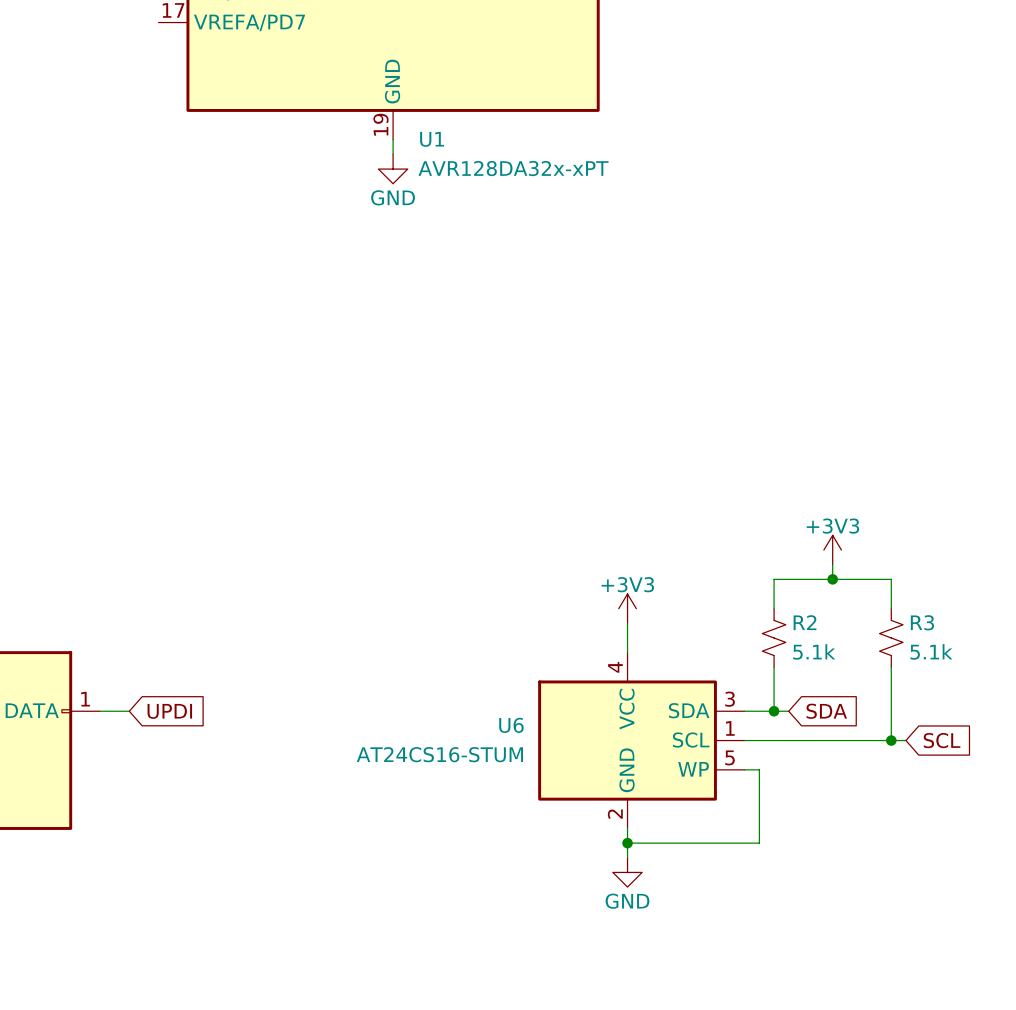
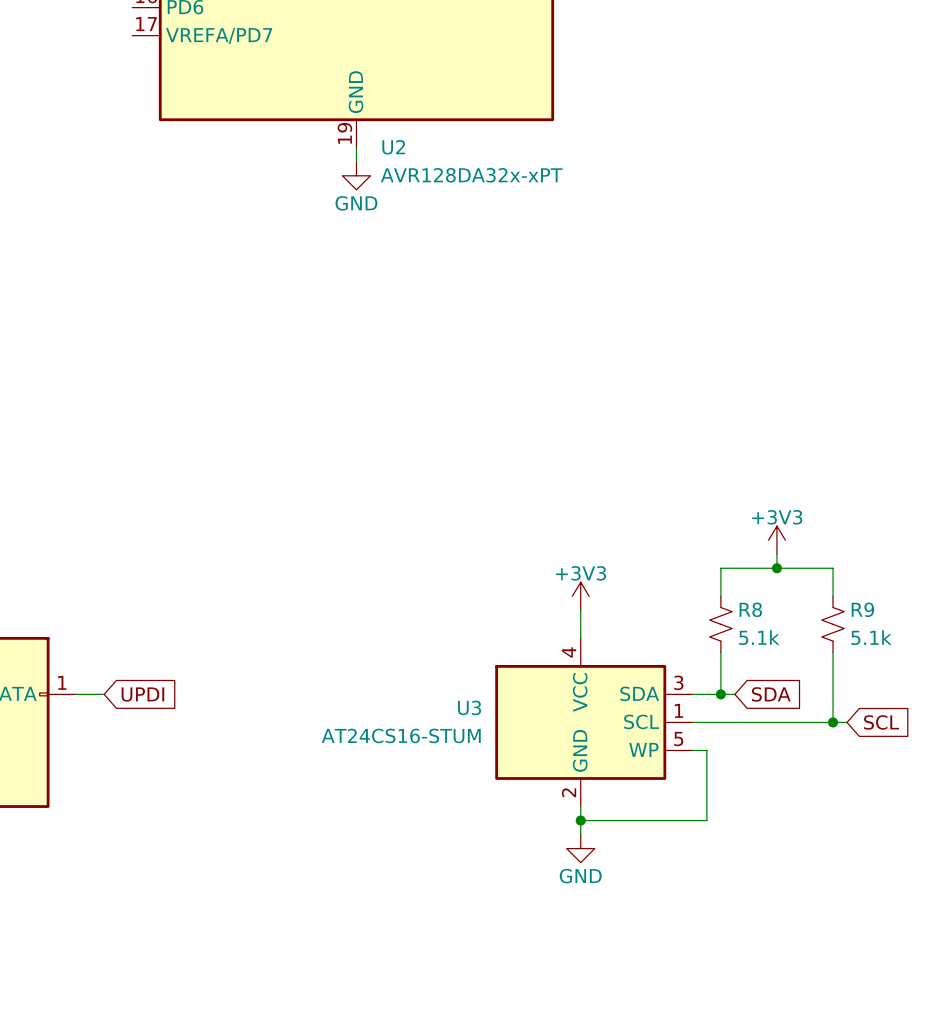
U1 name: U1 (432, 139) -> U2 (393, 147)
R2 name: R2 (805, 622) -> R8 (750, 609)
R3 name: R3 (922, 622) -> R9 (862, 609)
U6 name: U6 (511, 725) -> U3 (469, 707)

